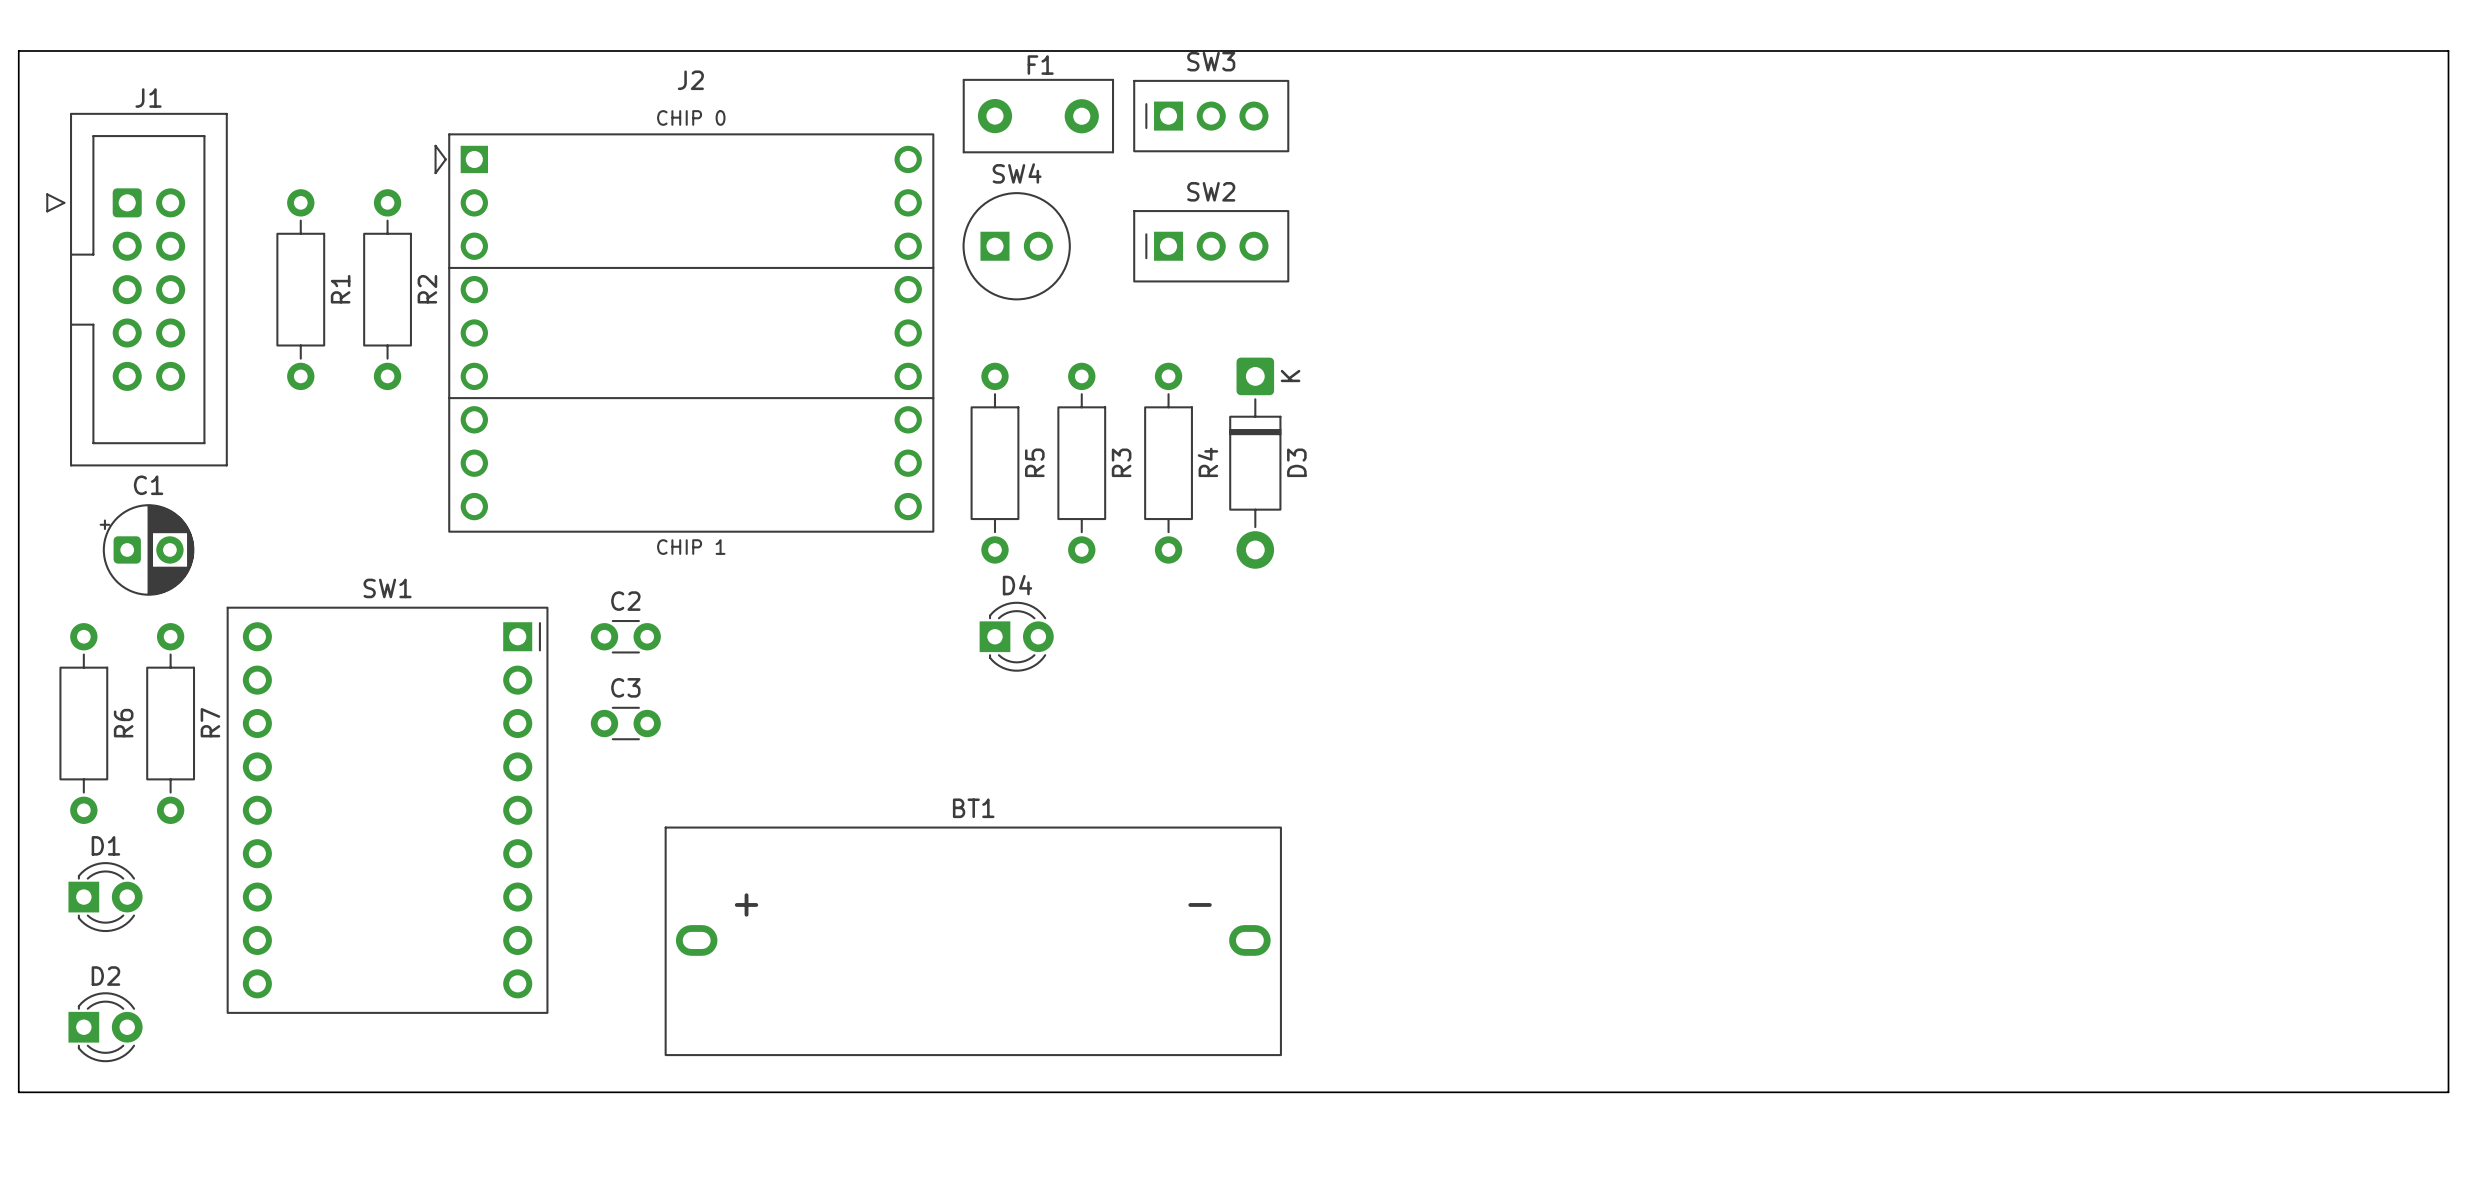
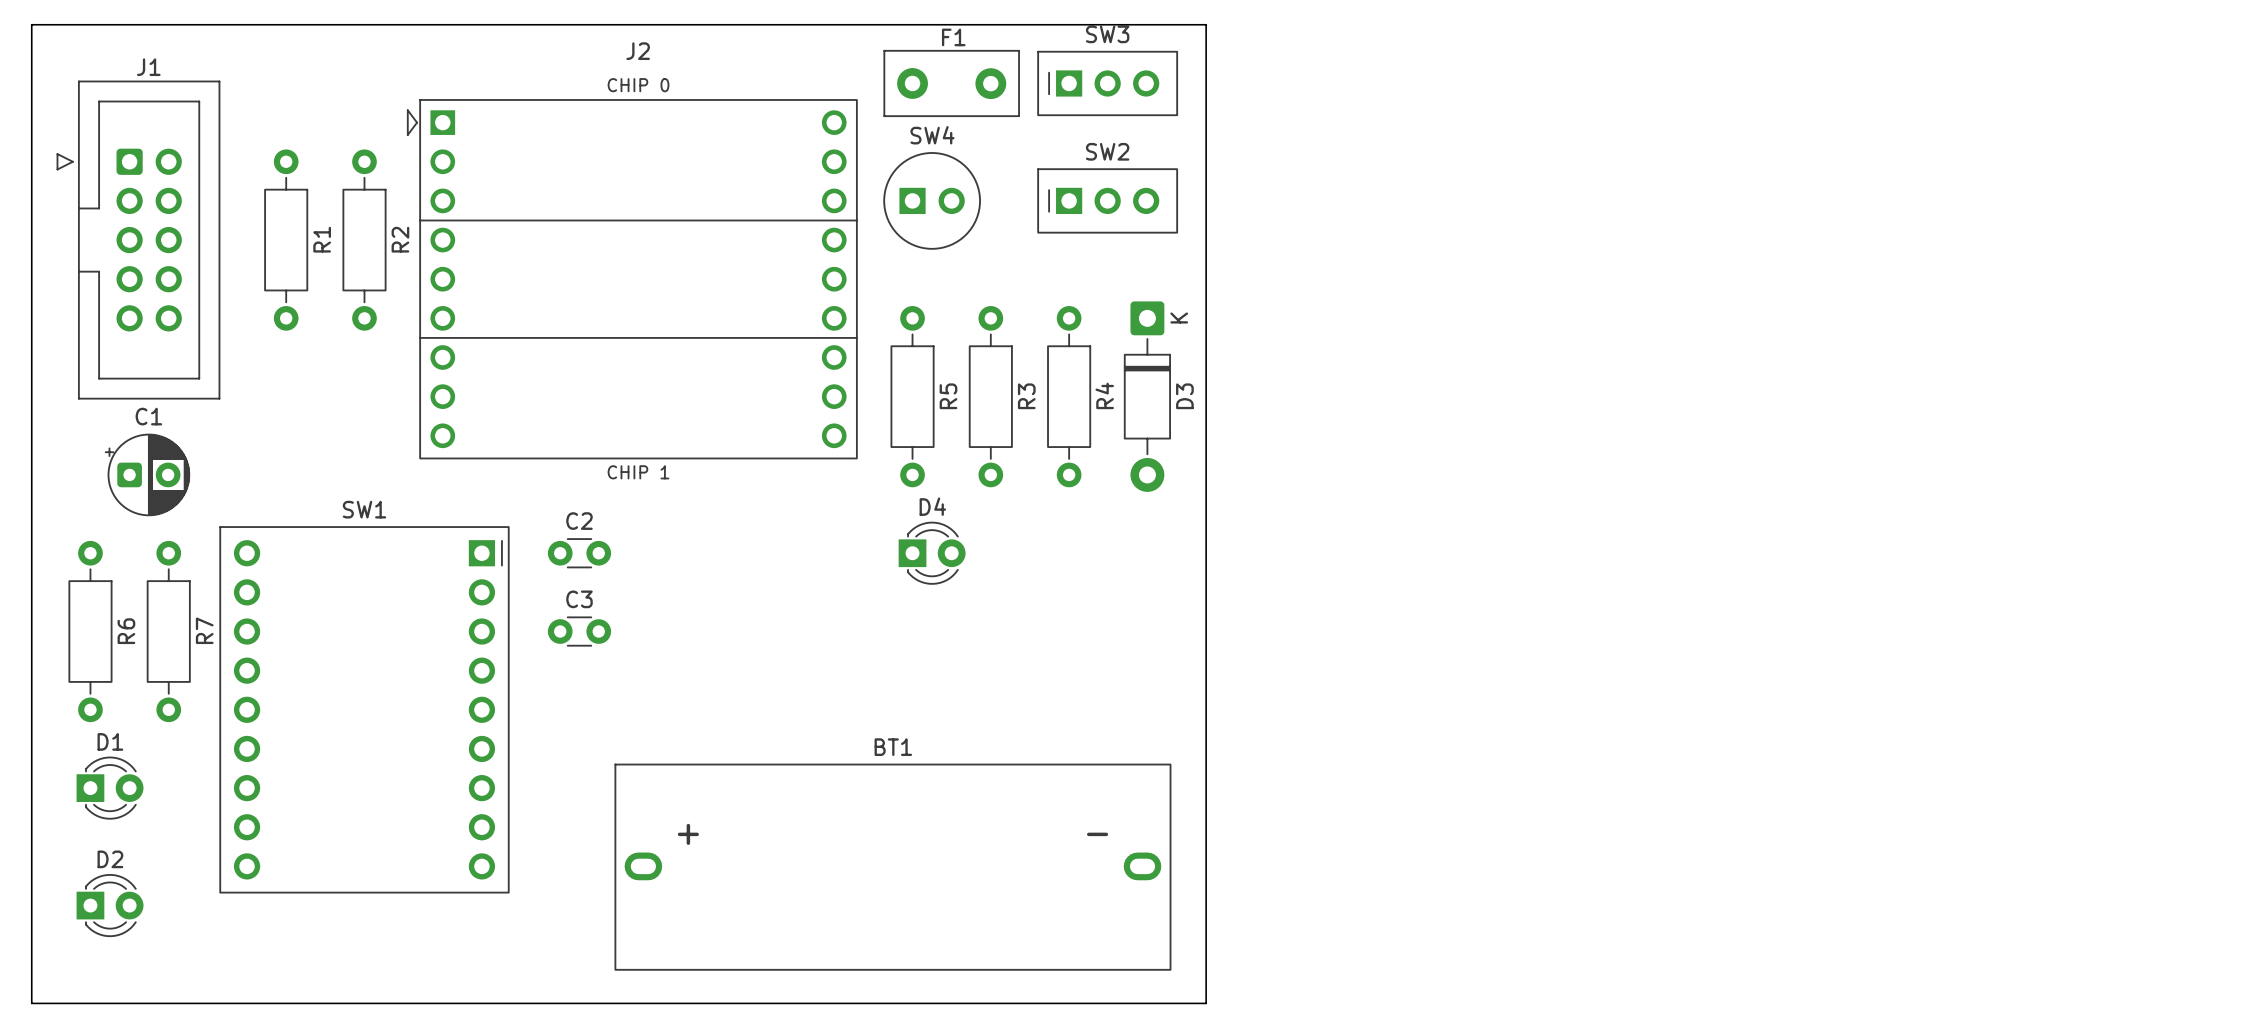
board edge: (1320, 51) (2448, 51) (2448, 1092) (18, 1092) -> (1206, 24) (1206, 1003) (31, 1003) (31, 964)
BT1 position: (973, 941) -> (892, 867)

